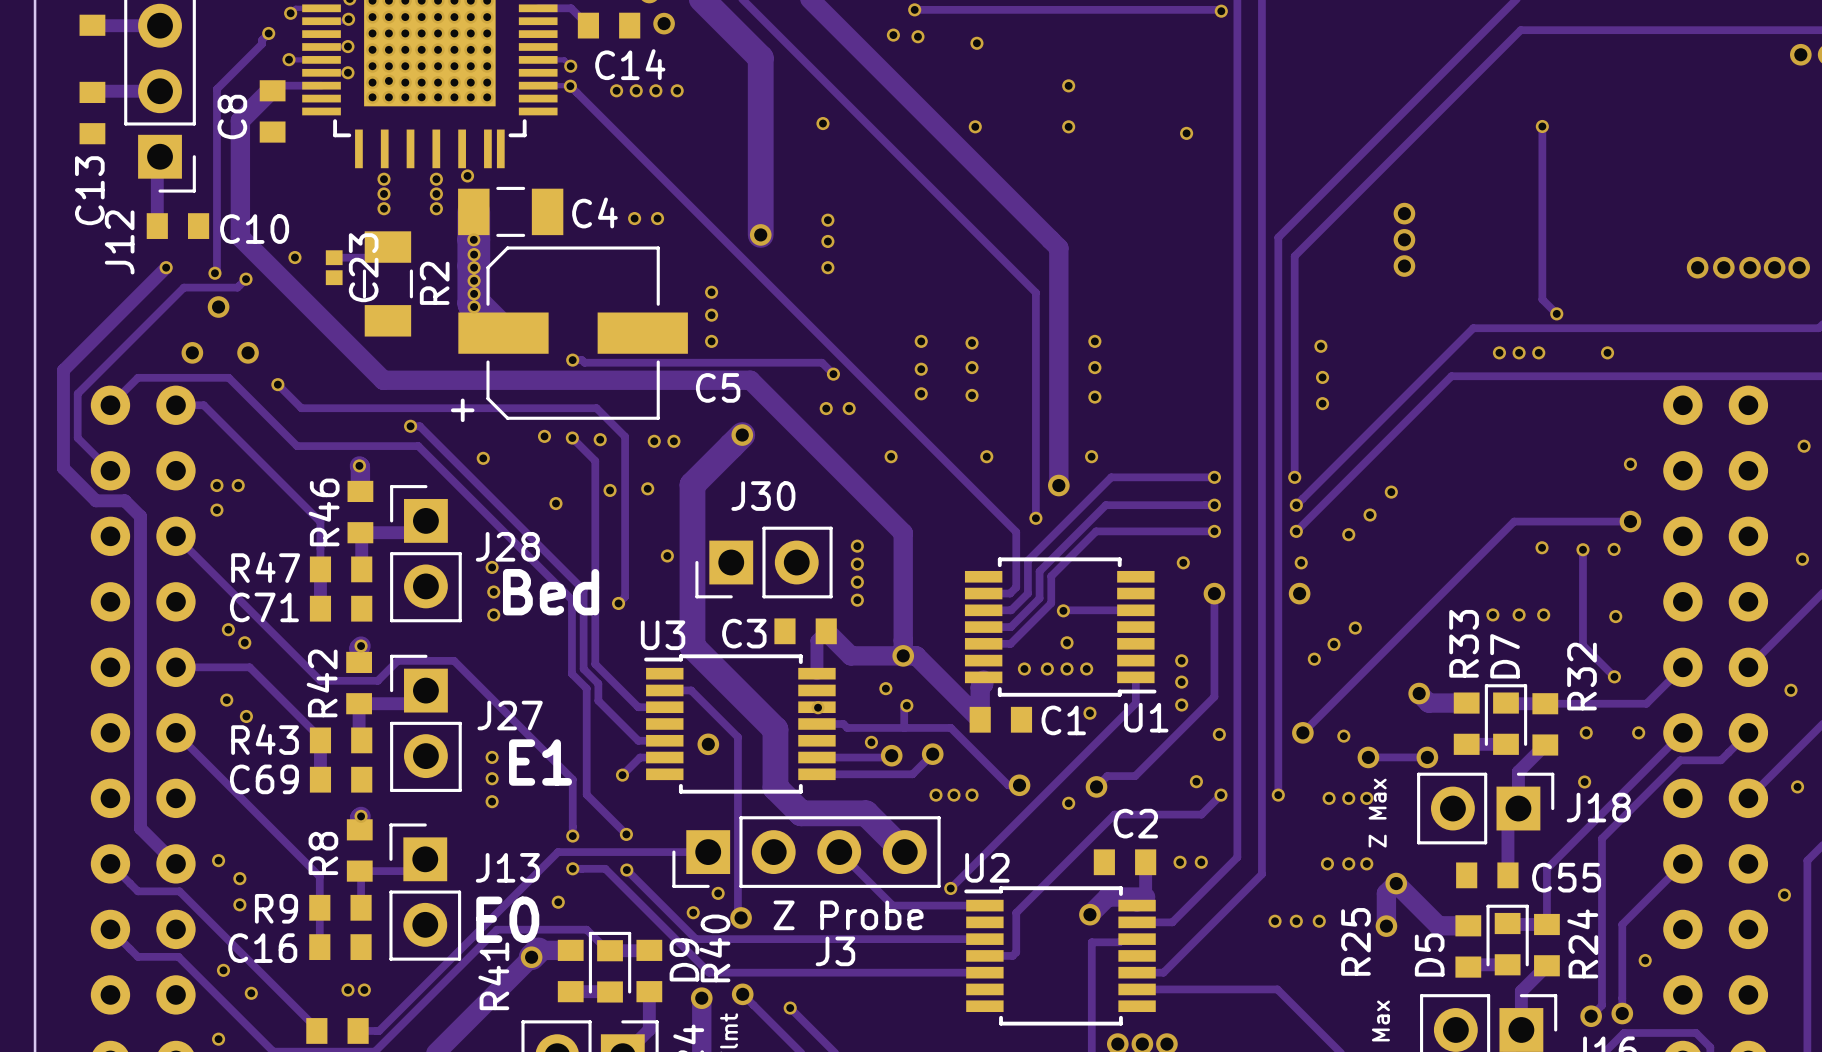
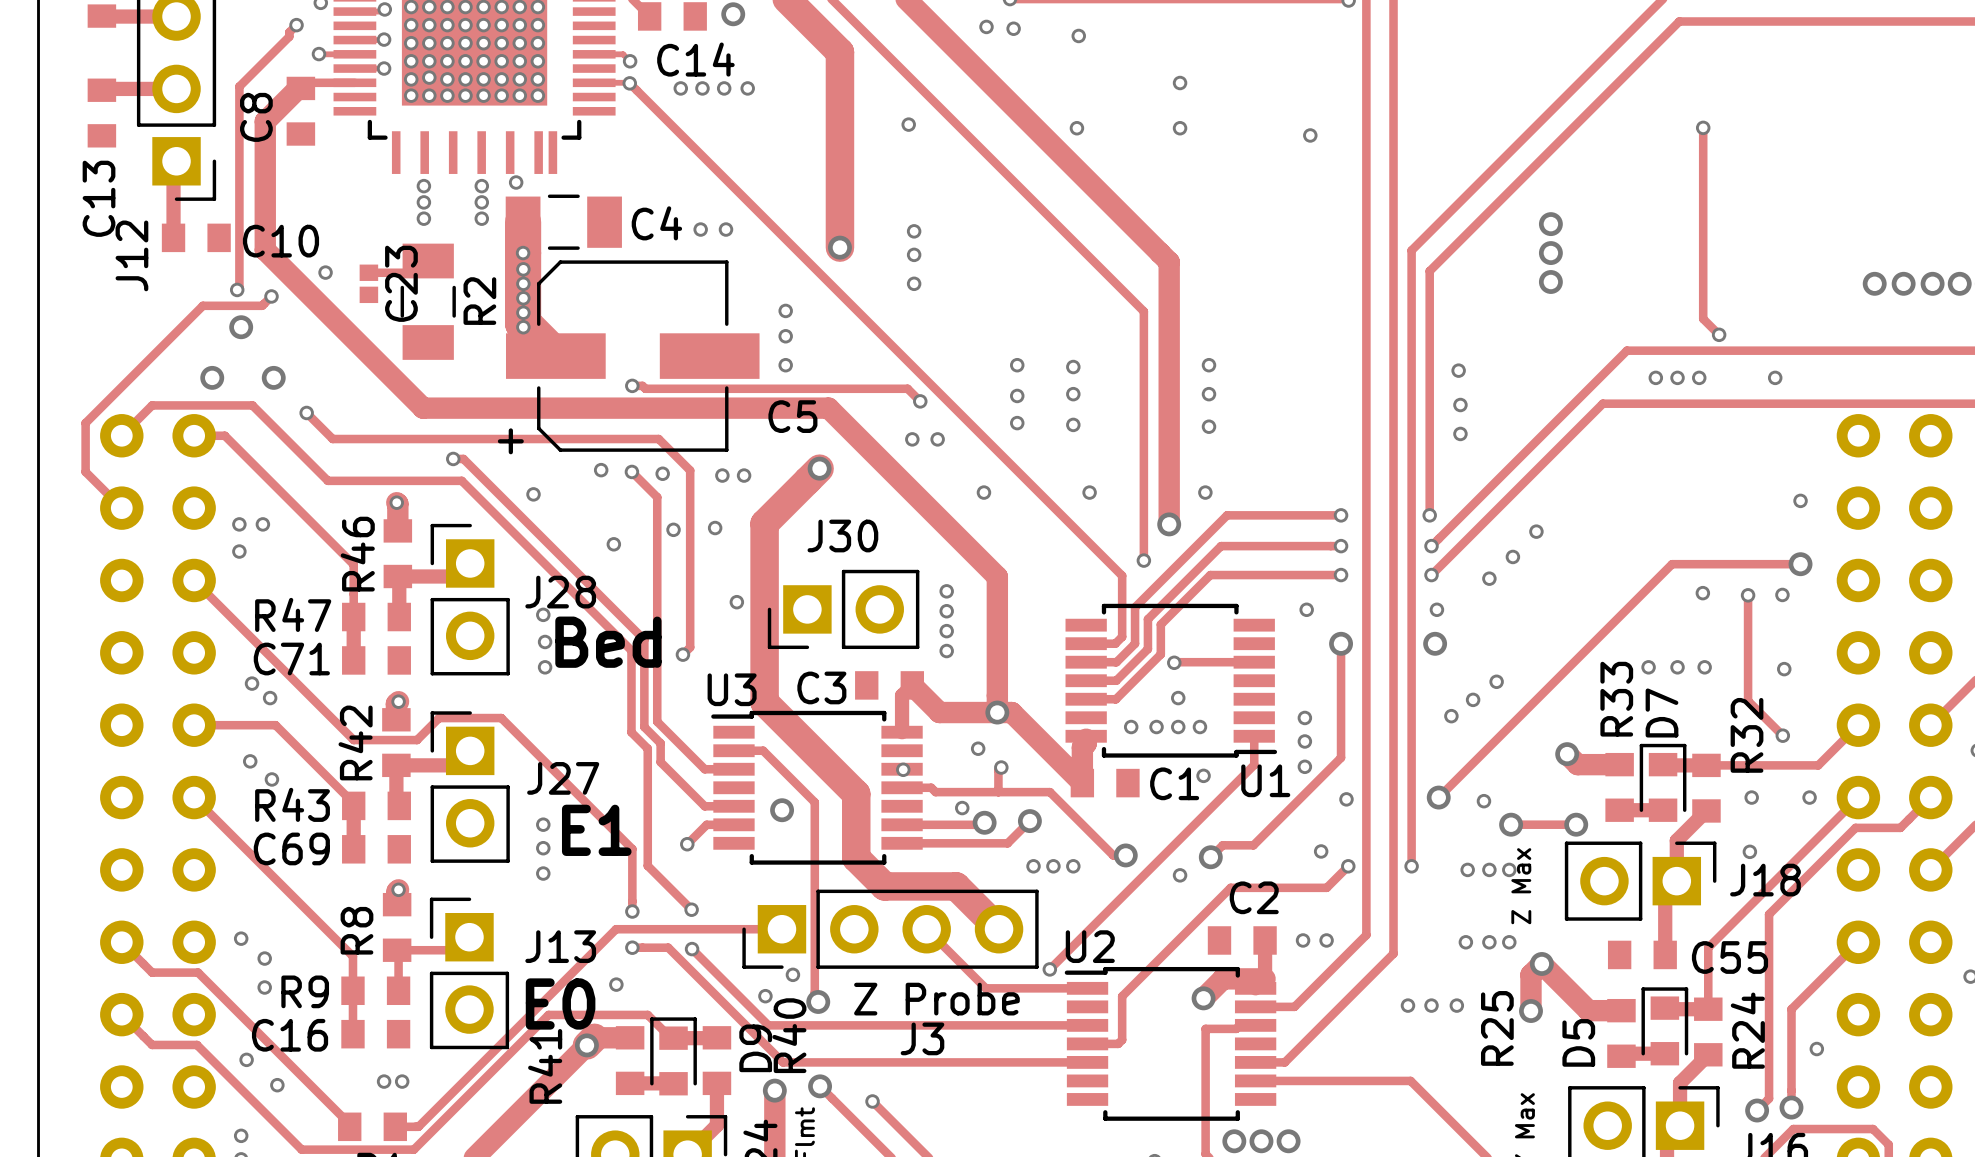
track: (166, 267) (63, 370) (63, 468) (96, 500) (124, 500) (140, 516) (140, 828) (175, 863) -> none
via: (166, 267) -> none

